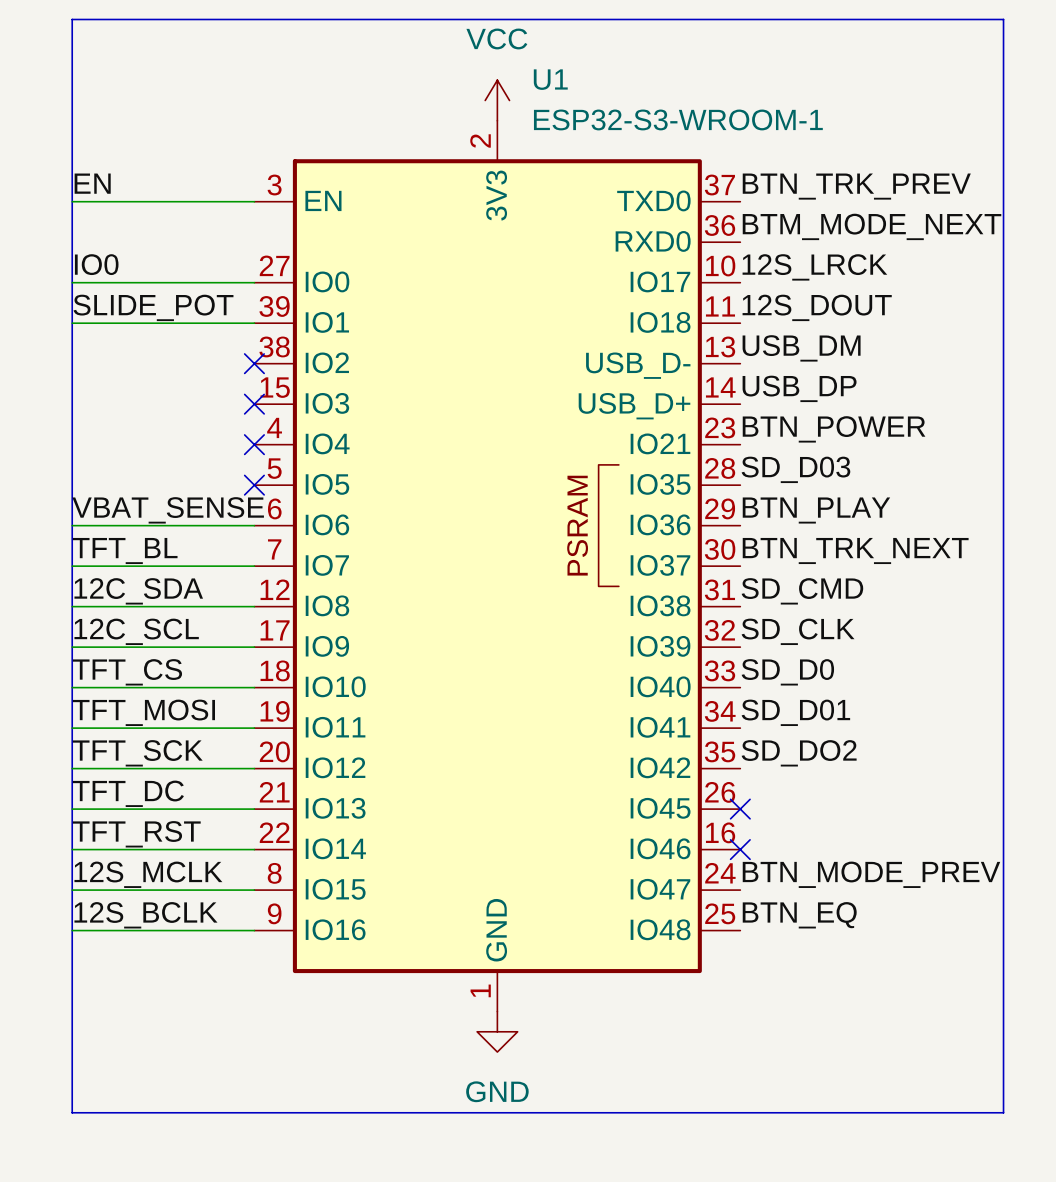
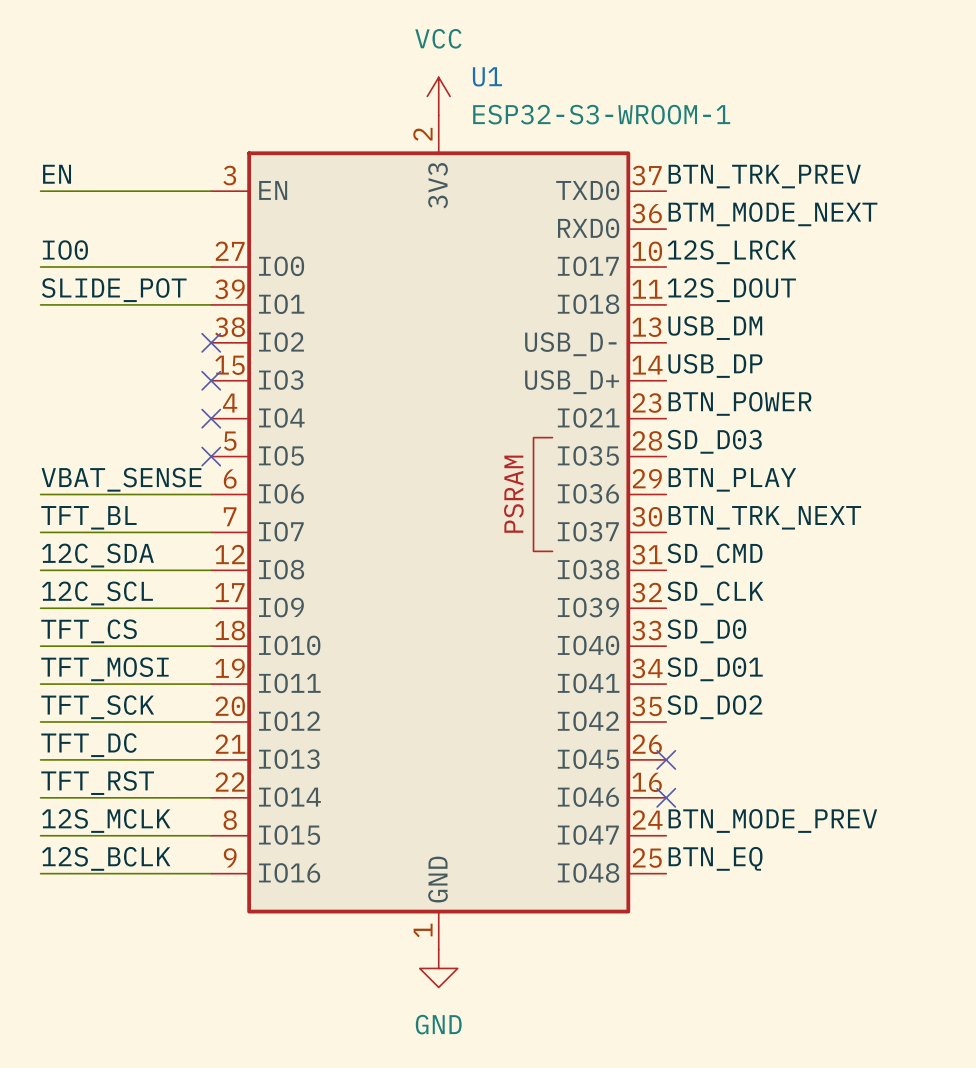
line: (72, 19) (1003, 19) (1003, 1112) (72, 1112) (72, 19) -> none

